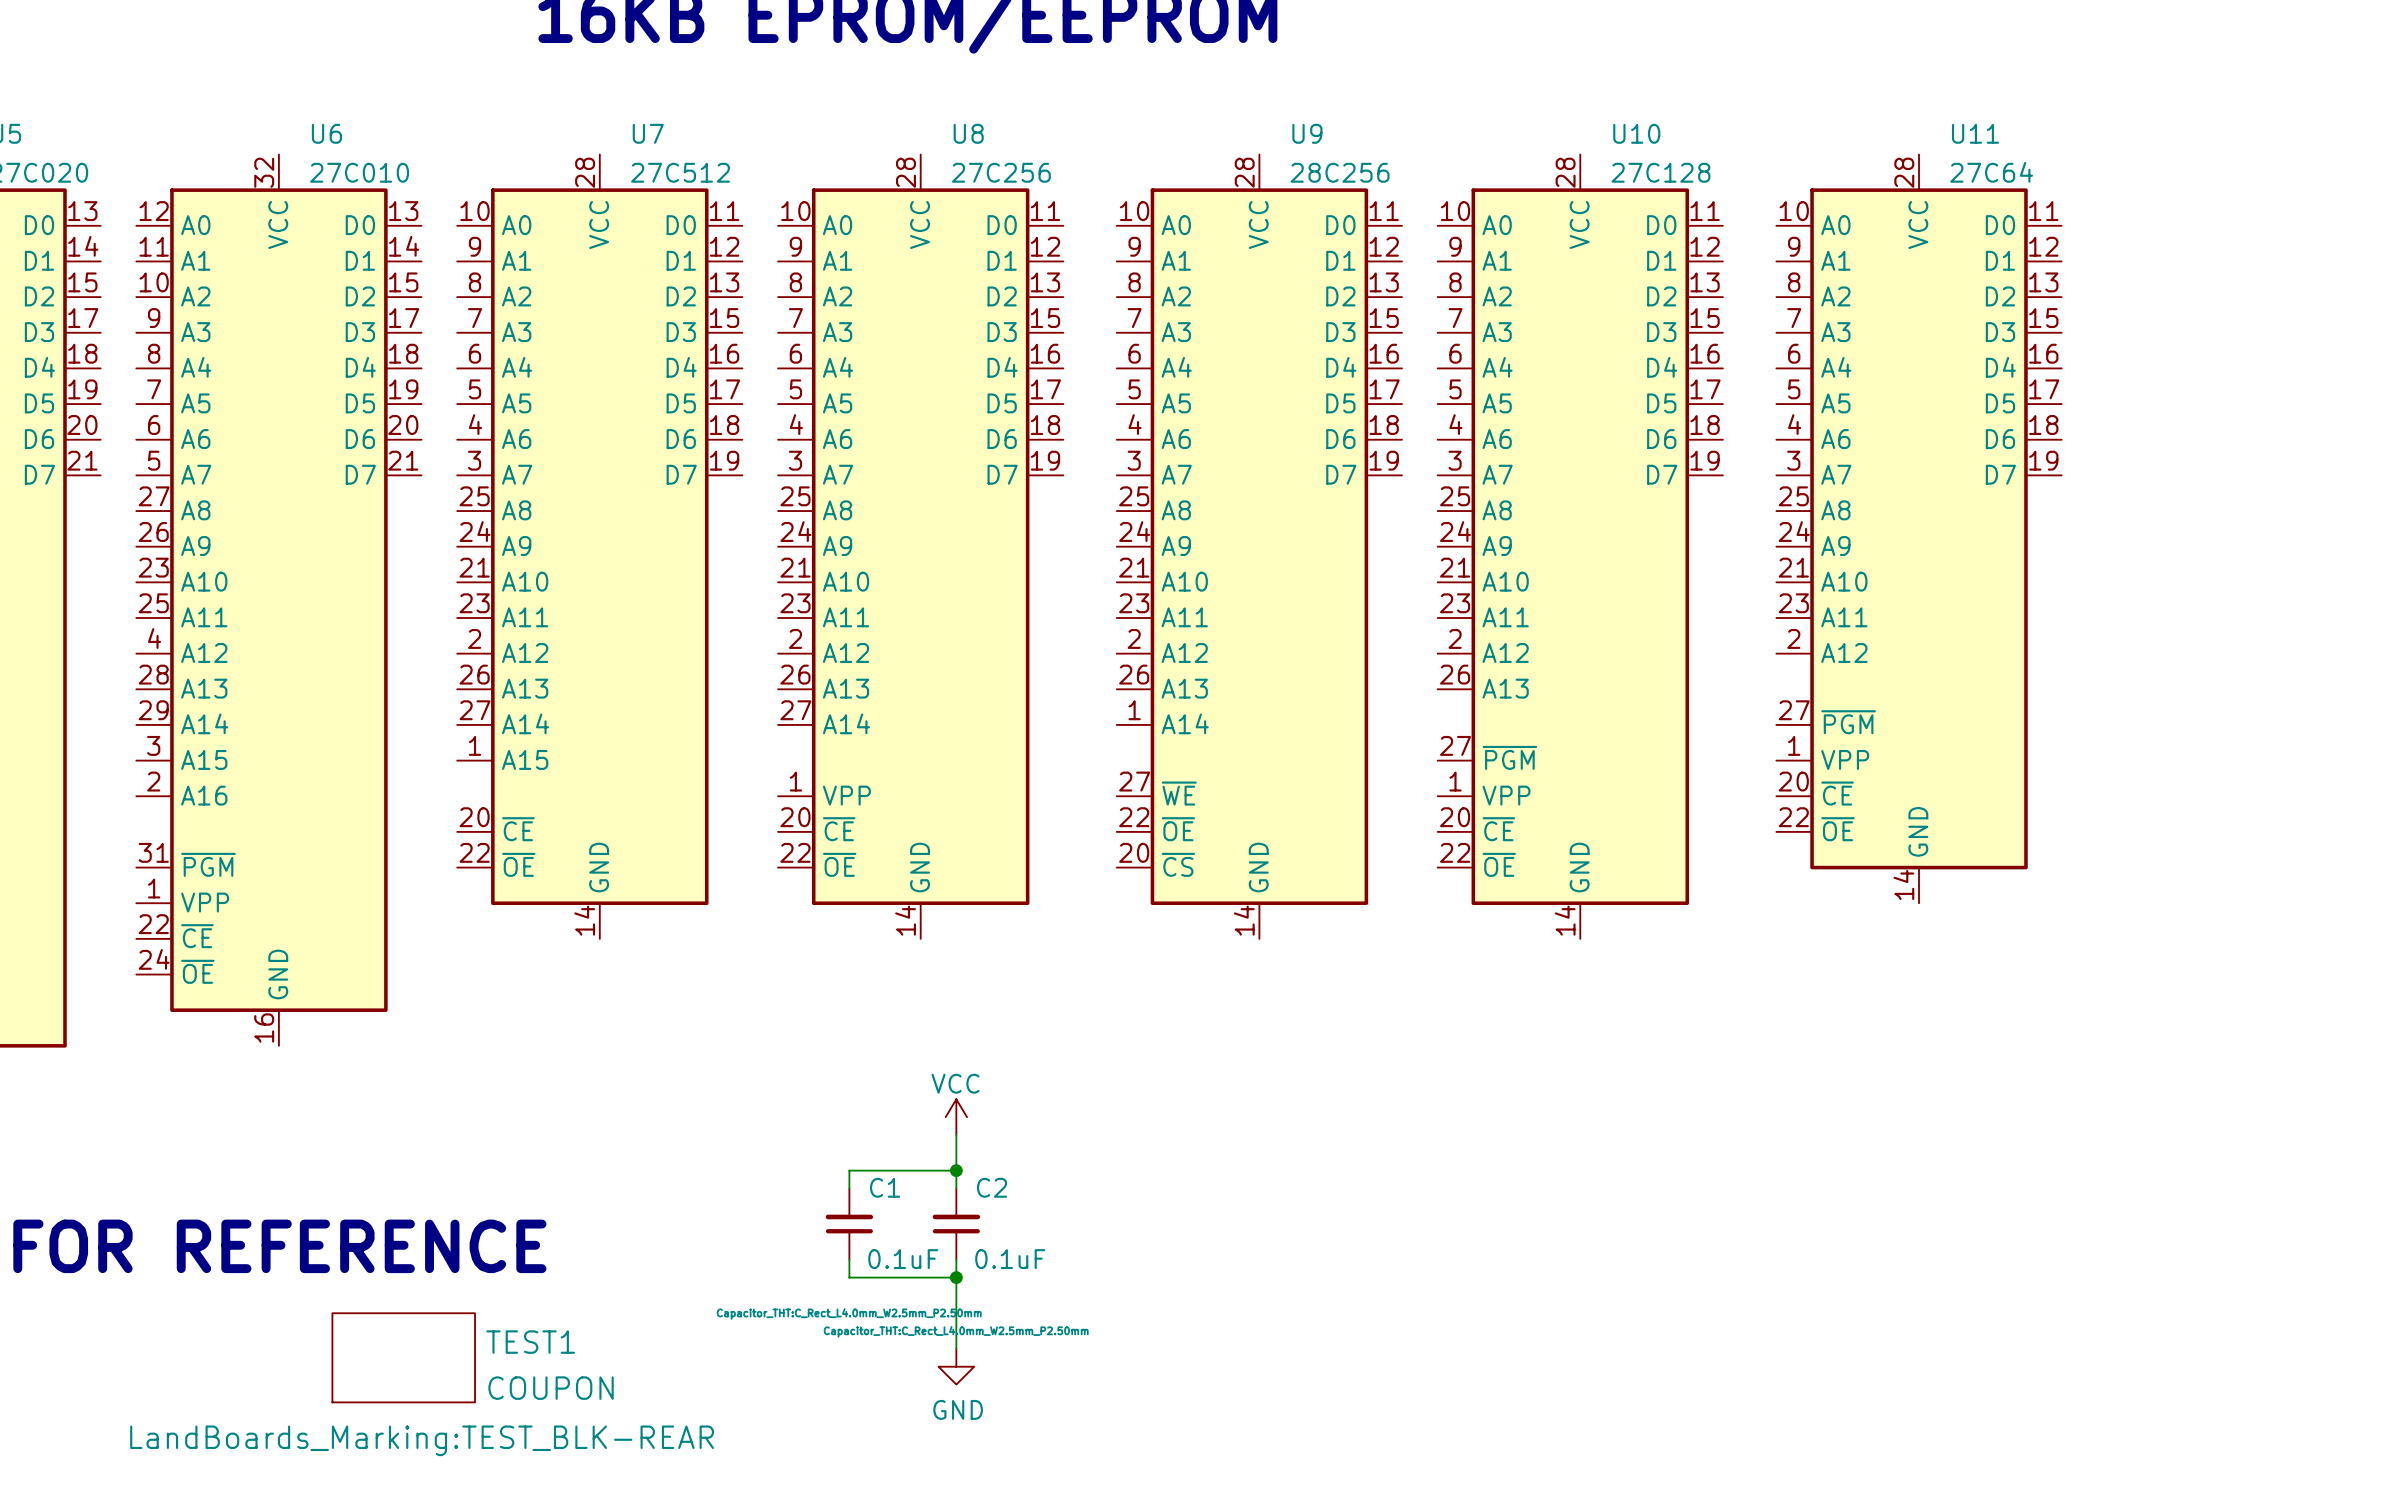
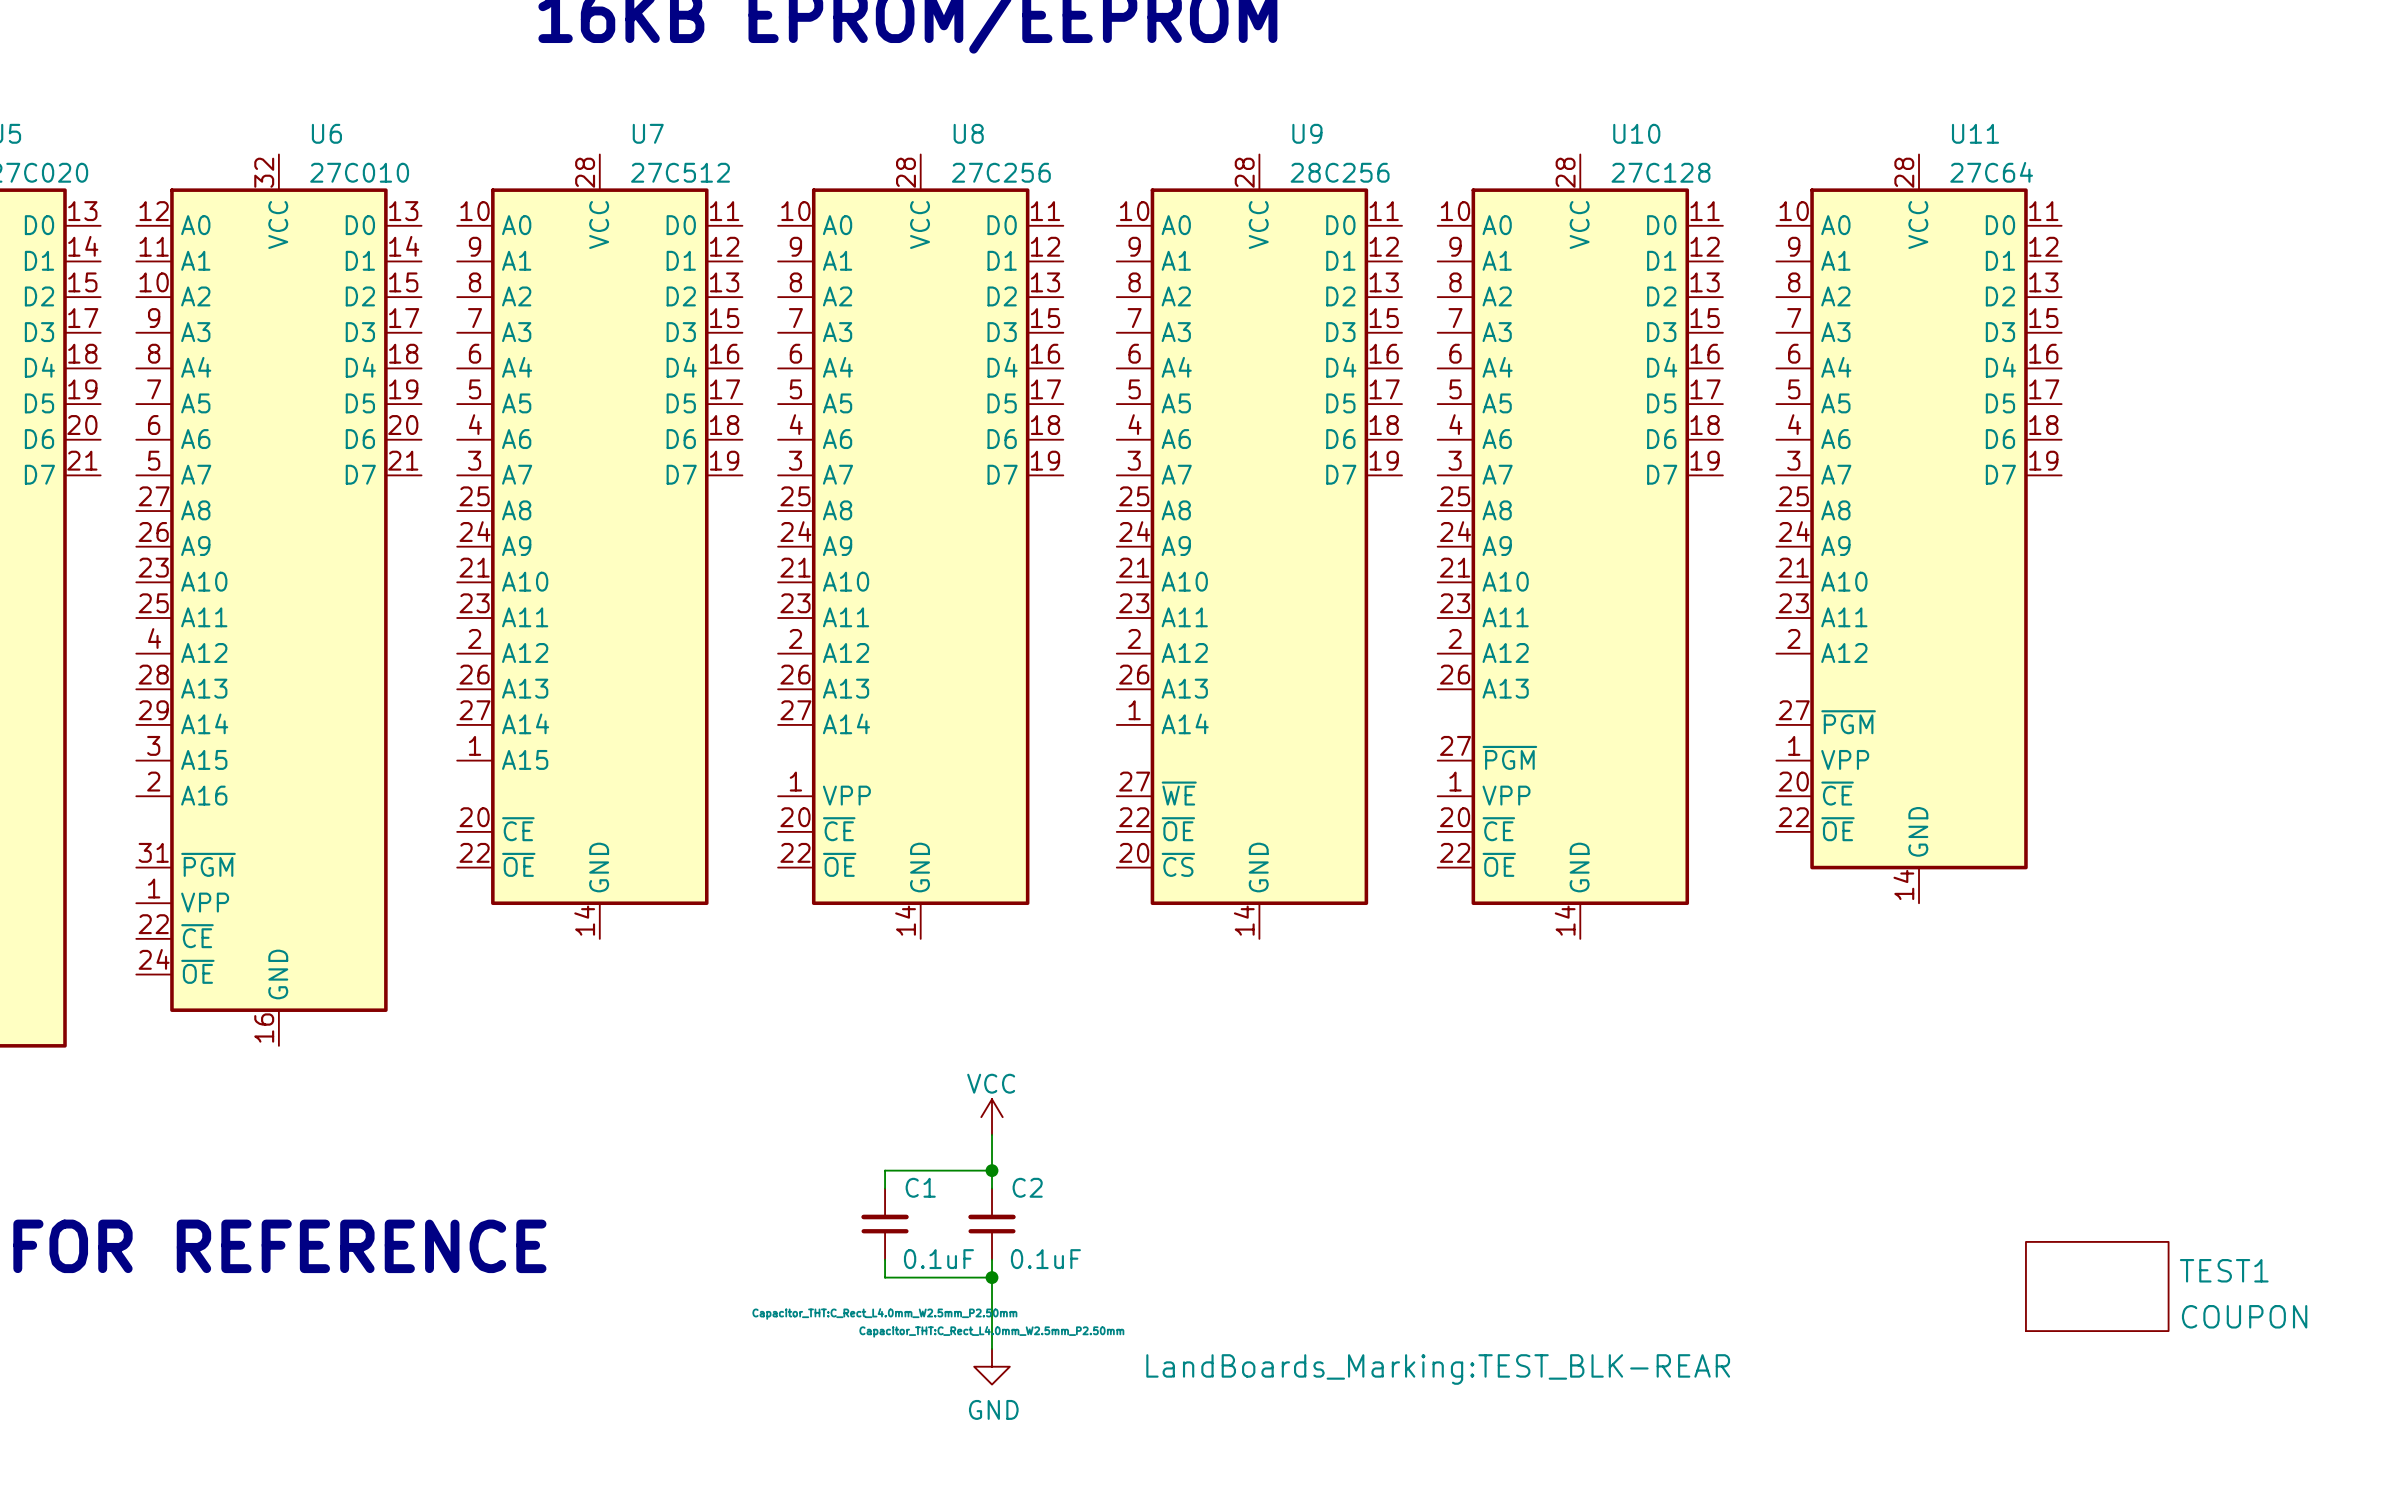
power symbol position: VCC (956, 1117) -> VCC (992, 1117)
wire: (956, 1134) (956, 1188) -> (992, 1134) (992, 1188)
wire: (885, 1170) (849, 1170) (849, 1188) -> (885, 1170) (885, 1188)
wire: none -> (956, 1170) (992, 1170)
junction position: (956, 1170) -> (992, 1170)
C1 position: (849, 1224) -> (885, 1224)
C2 position: (956, 1224) -> (992, 1224)
wire: (849, 1259) (849, 1277) (885, 1277) -> (885, 1259) (885, 1277)
wire: (956, 1259) (956, 1348) -> (992, 1259) (992, 1348)
wire: none -> (956, 1277) (992, 1277)
junction position: (956, 1277) -> (992, 1277)
TEST1 position: (403, 1357) -> (2097, 1286)
power symbol position: GND (956, 1366) -> GND (992, 1366)
TEST1 text position: LandBoards_Marking:TEST_BLK-REAR (422, 1440) -> LandBoards_Marking:TEST_BLK-REAR (1438, 1369)

